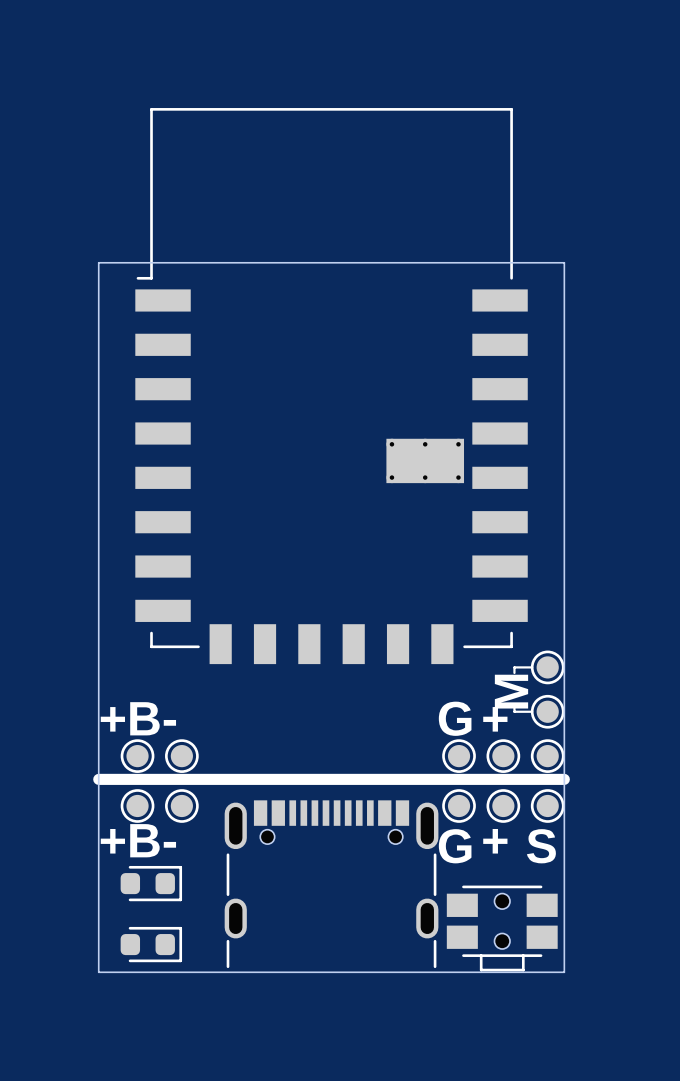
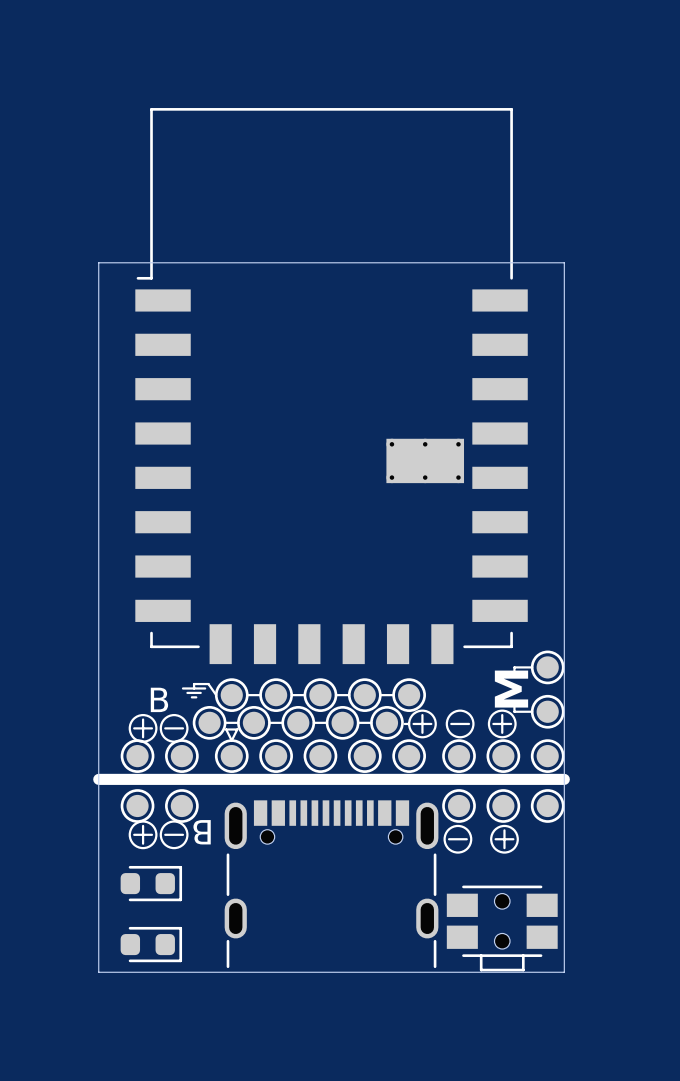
line: none -> (194, 688) (194, 684) (208, 684) (216, 695)
line: none -> (205, 688) (182, 688)
line: none -> (200, 692) (187, 692)
part: none -> (231, 695)
line: none -> (260, 695) (247, 695)
part: none -> (276, 695)
line: none -> (304, 695) (291, 695)
part: none -> (320, 695)
line: none -> (349, 695) (335, 695)
part: none -> (364, 695)
line: none -> (393, 695) (380, 695)
part: none -> (409, 695)
line: none -> (196, 697) (191, 697)
text: none -> B (159, 699)
drawing: none -> [408, 709, 517, 739]
drawing: none -> [128, 713, 189, 743]
line: none -> (422, 715) (422, 732)
line: none -> (502, 715) (502, 732)
text: +B- (138, 718) -> none
text: G (455, 718) -> none
line: none -> (143, 719) (143, 737)
text: + (495, 719) -> none
part: none -> (209, 722)
line: none -> (238, 722) (225, 722)
part: none -> (253, 722)
line: none -> (282, 722) (269, 722)
part: none -> (298, 722)
line: none -> (327, 722) (313, 722)
part: none -> (342, 722)
line: none -> (371, 722) (358, 722)
part: none -> (386, 722)
line: none -> (409, 723) (404, 723)
line: none -> (431, 723) (413, 723)
line: none -> (469, 723) (451, 723)
line: none -> (511, 723) (493, 723)
line: none -> (151, 728) (134, 728)
line: none -> (182, 728) (165, 728)
line: none -> (237, 729) (226, 729) (231, 740) (237, 729)
part: none -> (231, 756)
part: none -> (276, 756)
part: none -> (320, 756)
part: none -> (364, 756)
part: none -> (409, 756)
drawing: none -> [128, 820, 189, 850]
drawing: none -> [443, 824, 519, 854]
line: none -> (143, 825) (143, 843)
line: none -> (504, 830) (504, 848)
text: none -> B (202, 832)
line: none -> (151, 834) (134, 834)
line: none -> (182, 834) (165, 834)
line: none -> (466, 839) (449, 839)
line: none -> (513, 839) (495, 839)
text: +B- (138, 840) -> none
text: + (495, 841) -> none
text: G (455, 846) -> none
text: S (541, 846) -> none

